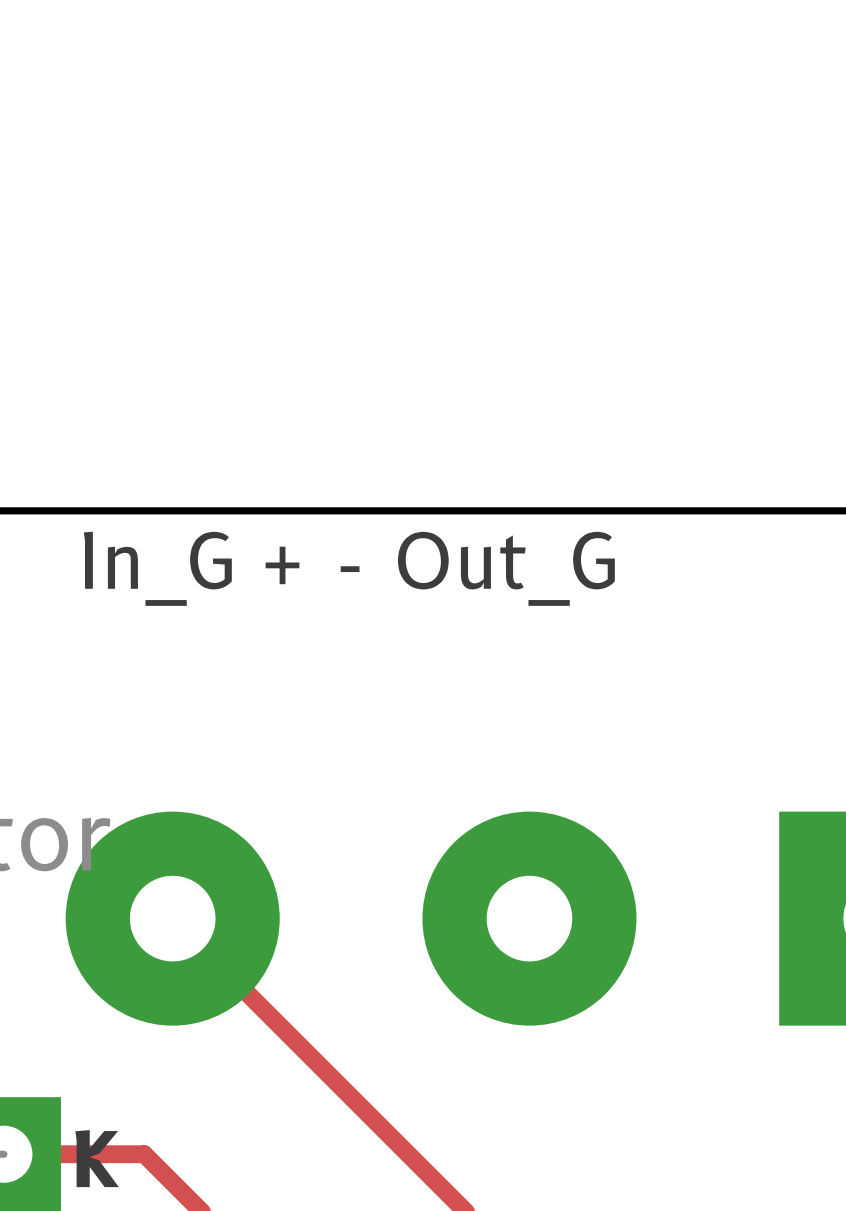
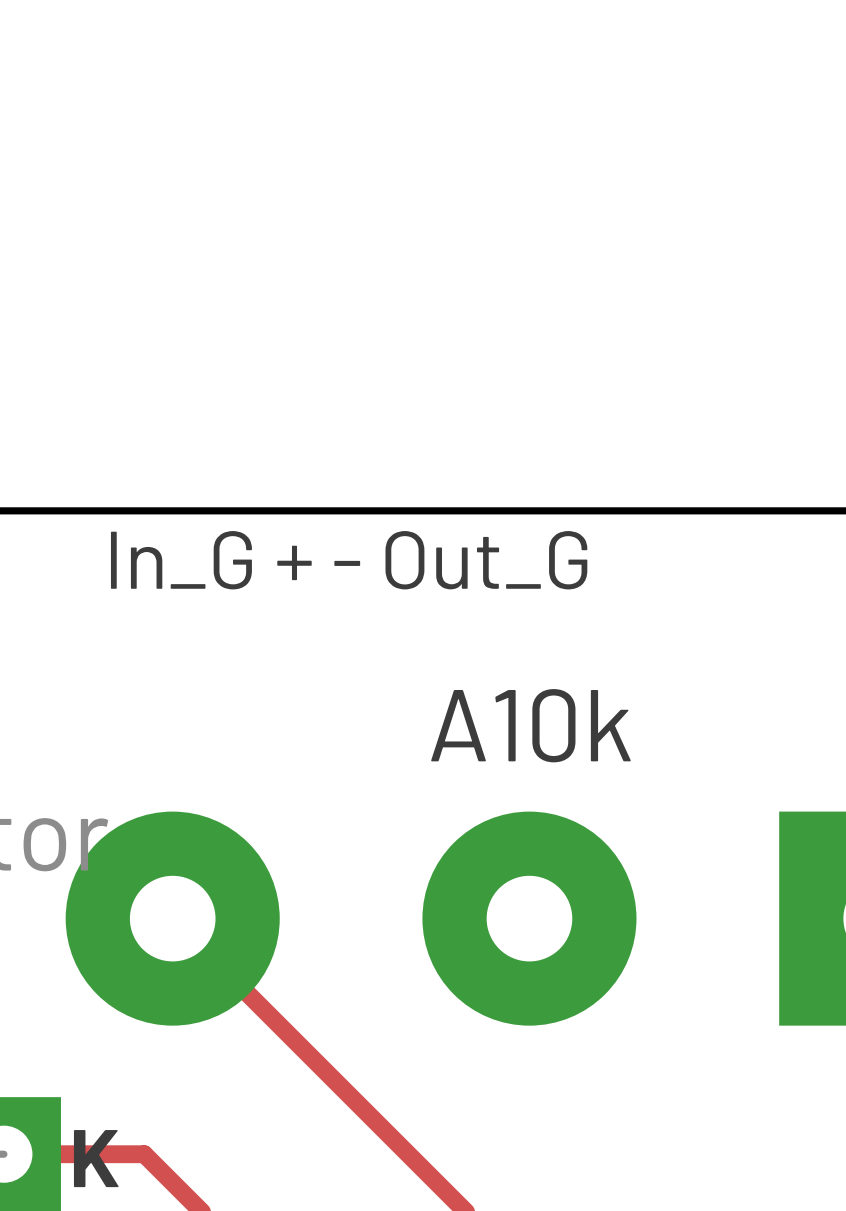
part value: none -> A10k (530, 725)

